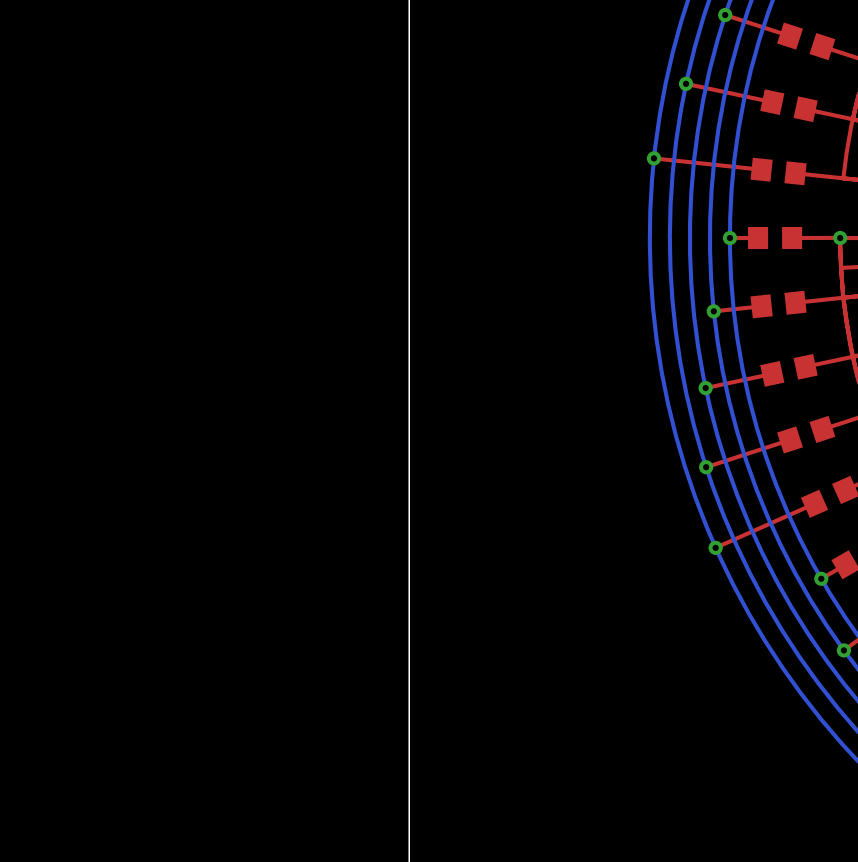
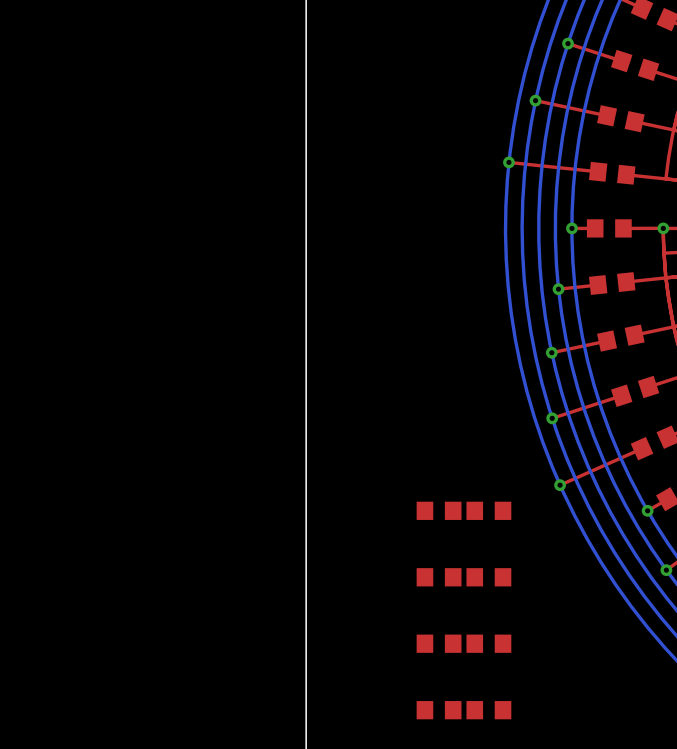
part: none -> (439, 510)
part: none -> (488, 510)
part: none -> (439, 577)
part: none -> (488, 577)
part: none -> (439, 643)
part: none -> (488, 643)
part: none -> (439, 710)
part: none -> (488, 710)

